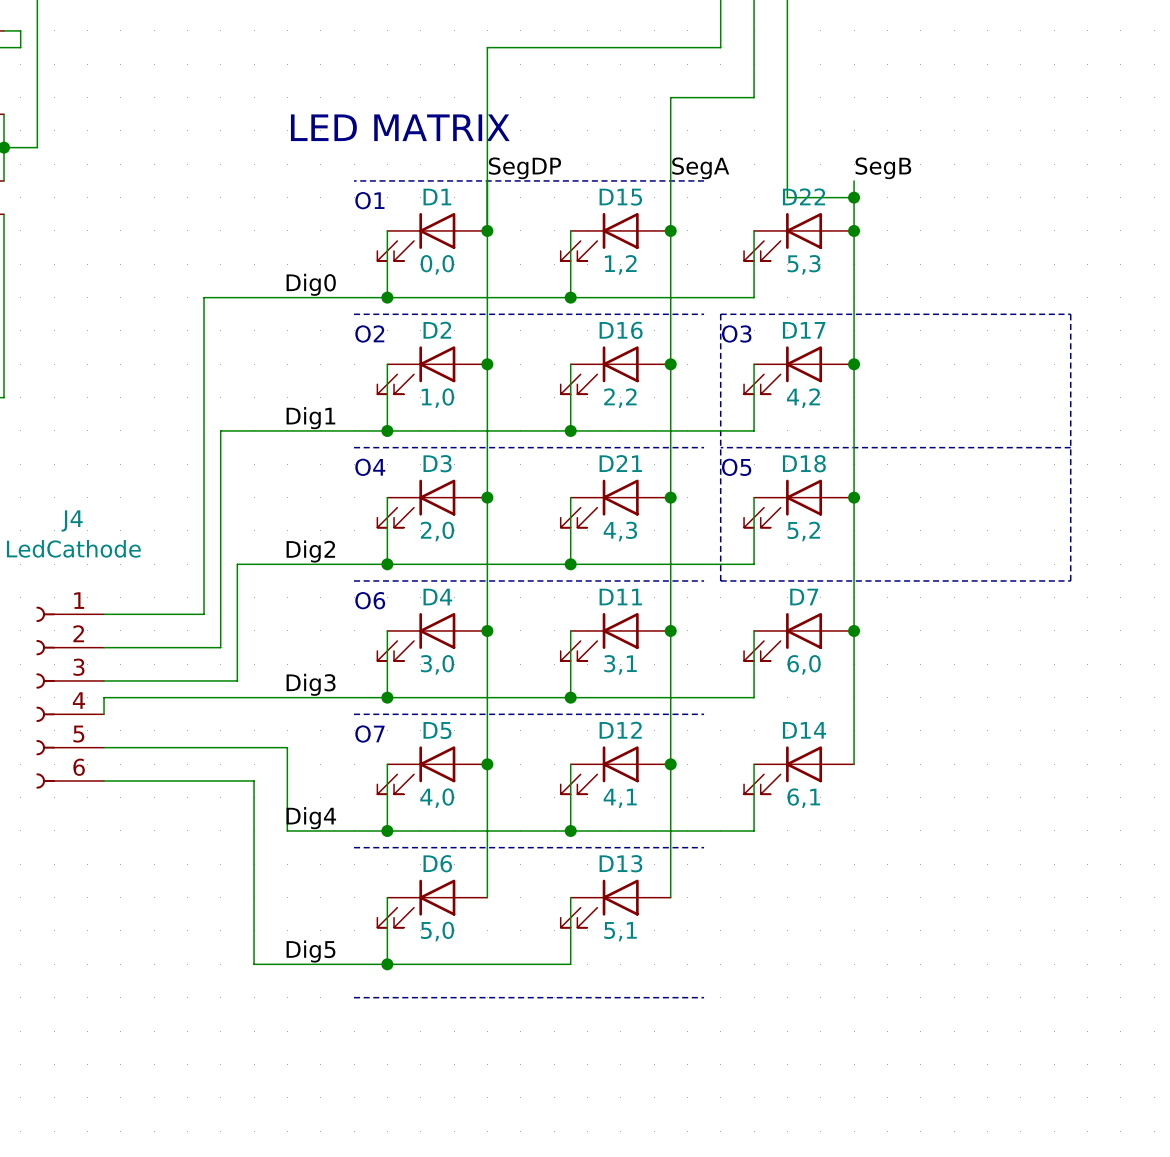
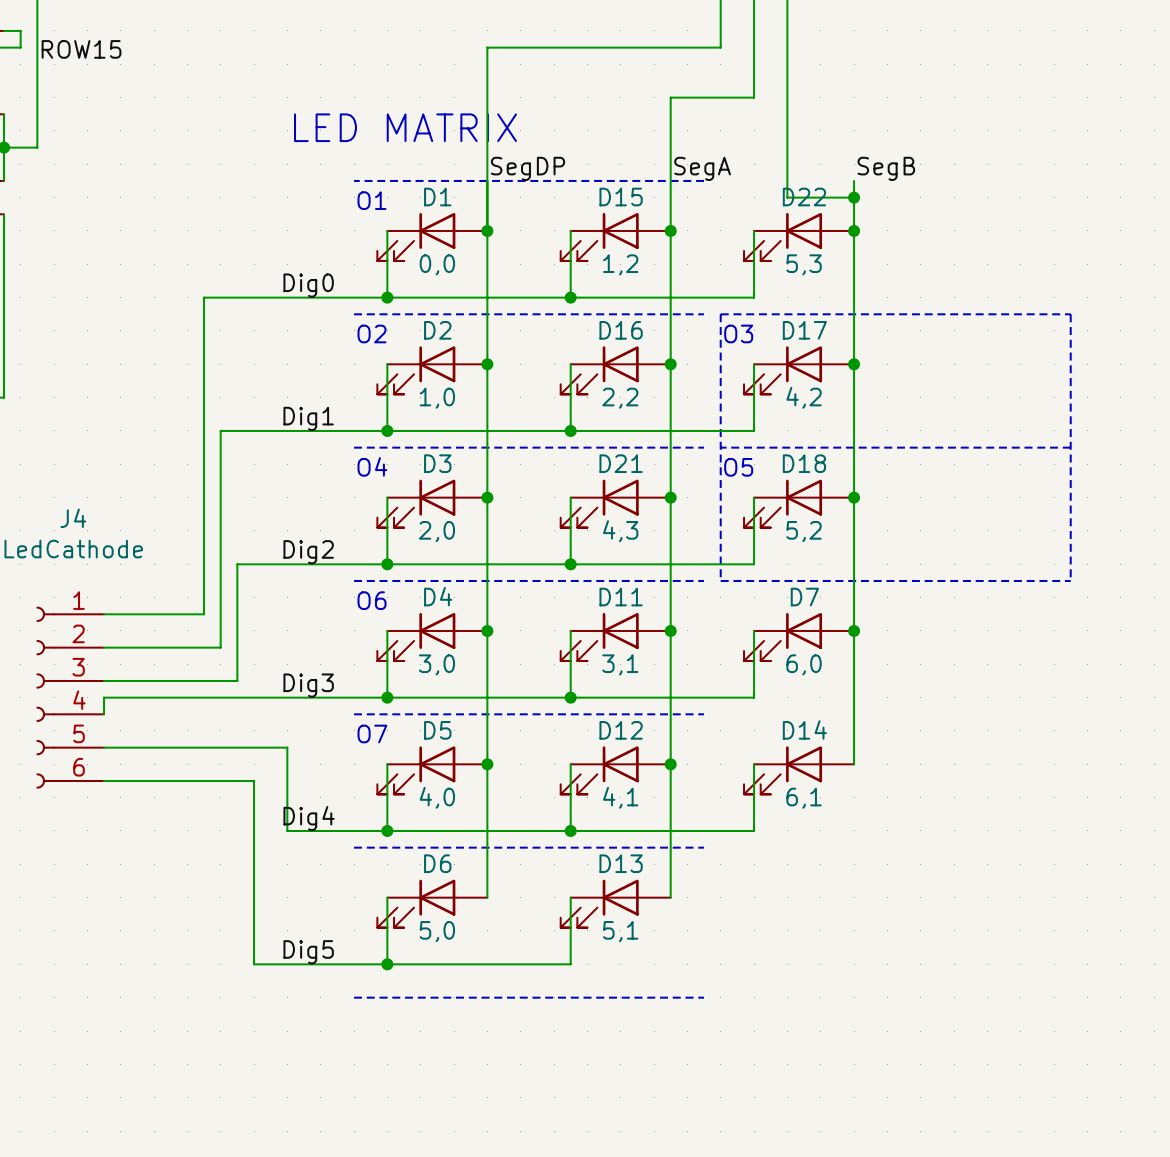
label: none -> ROW15 (81, 49)

